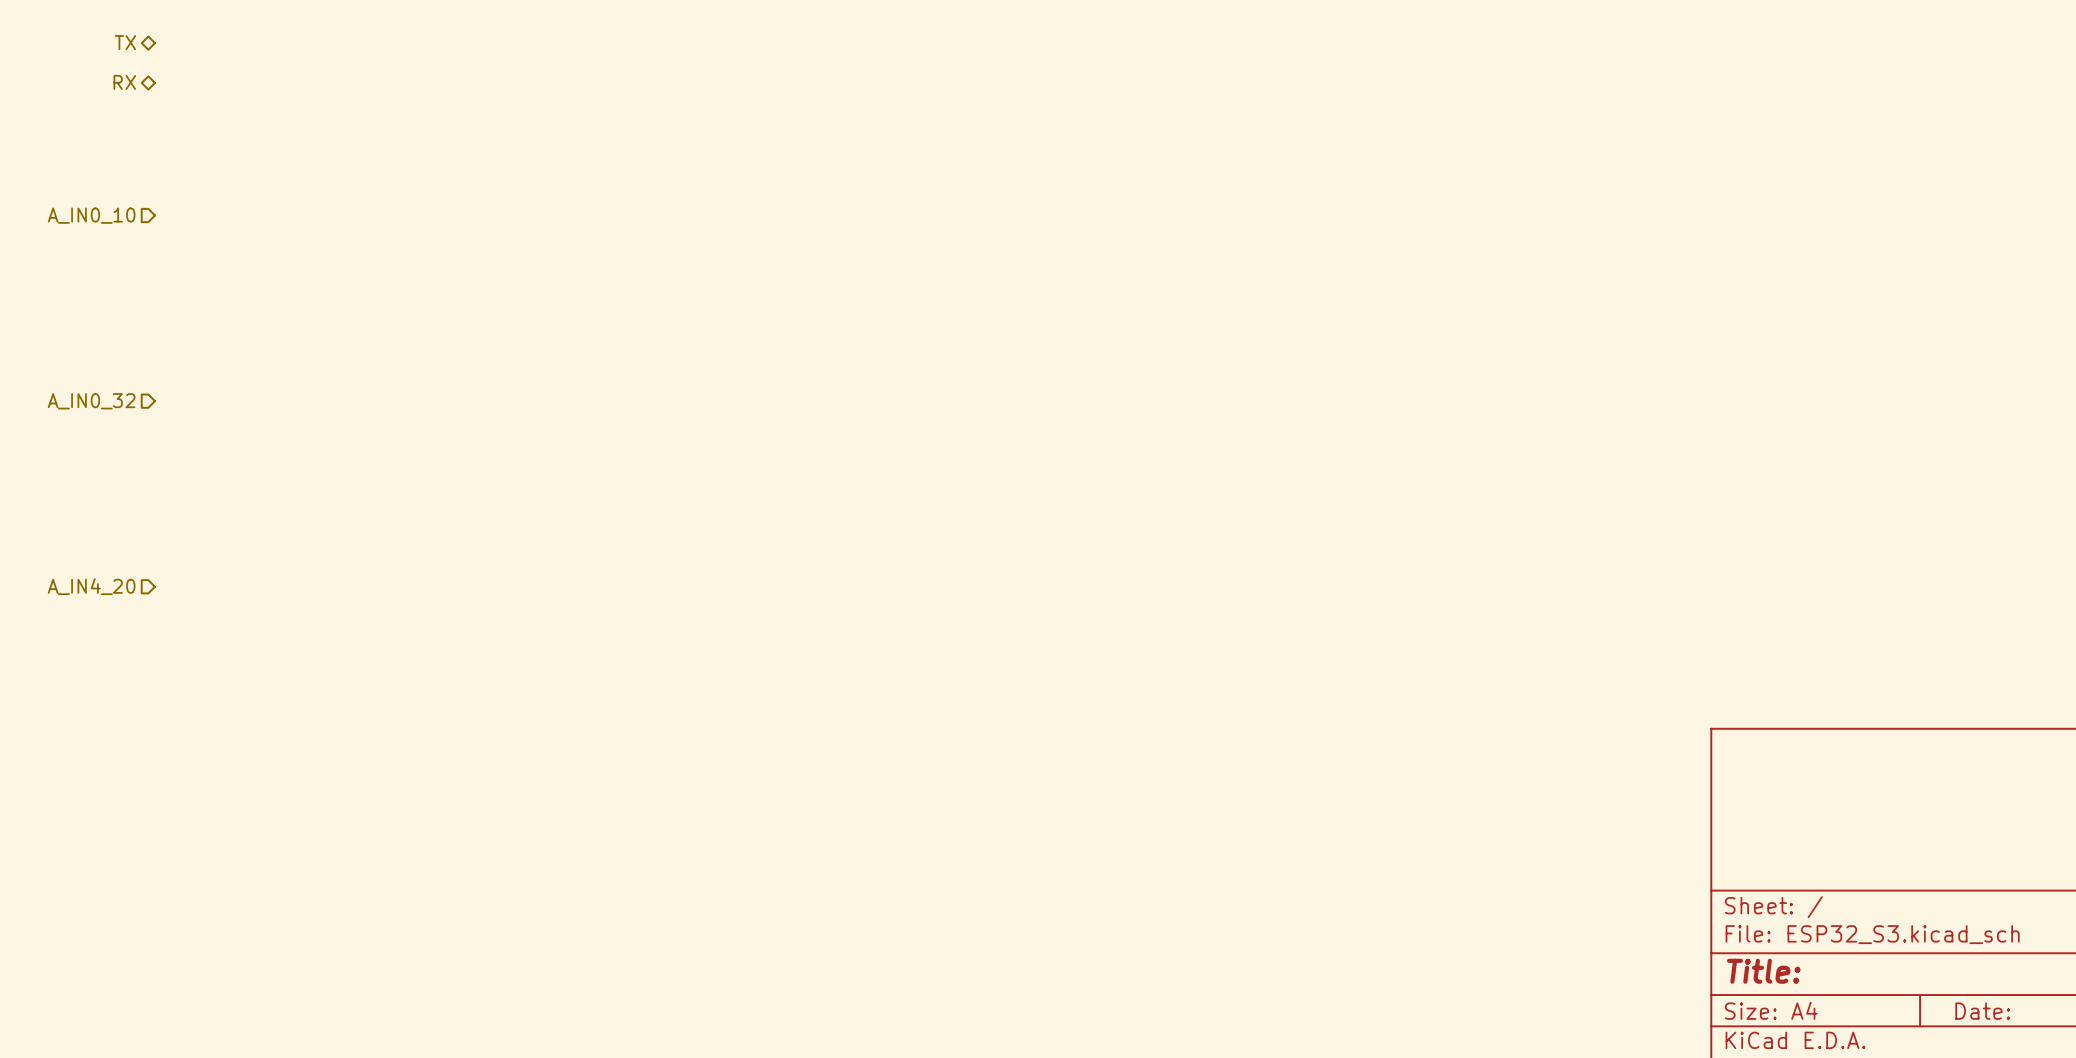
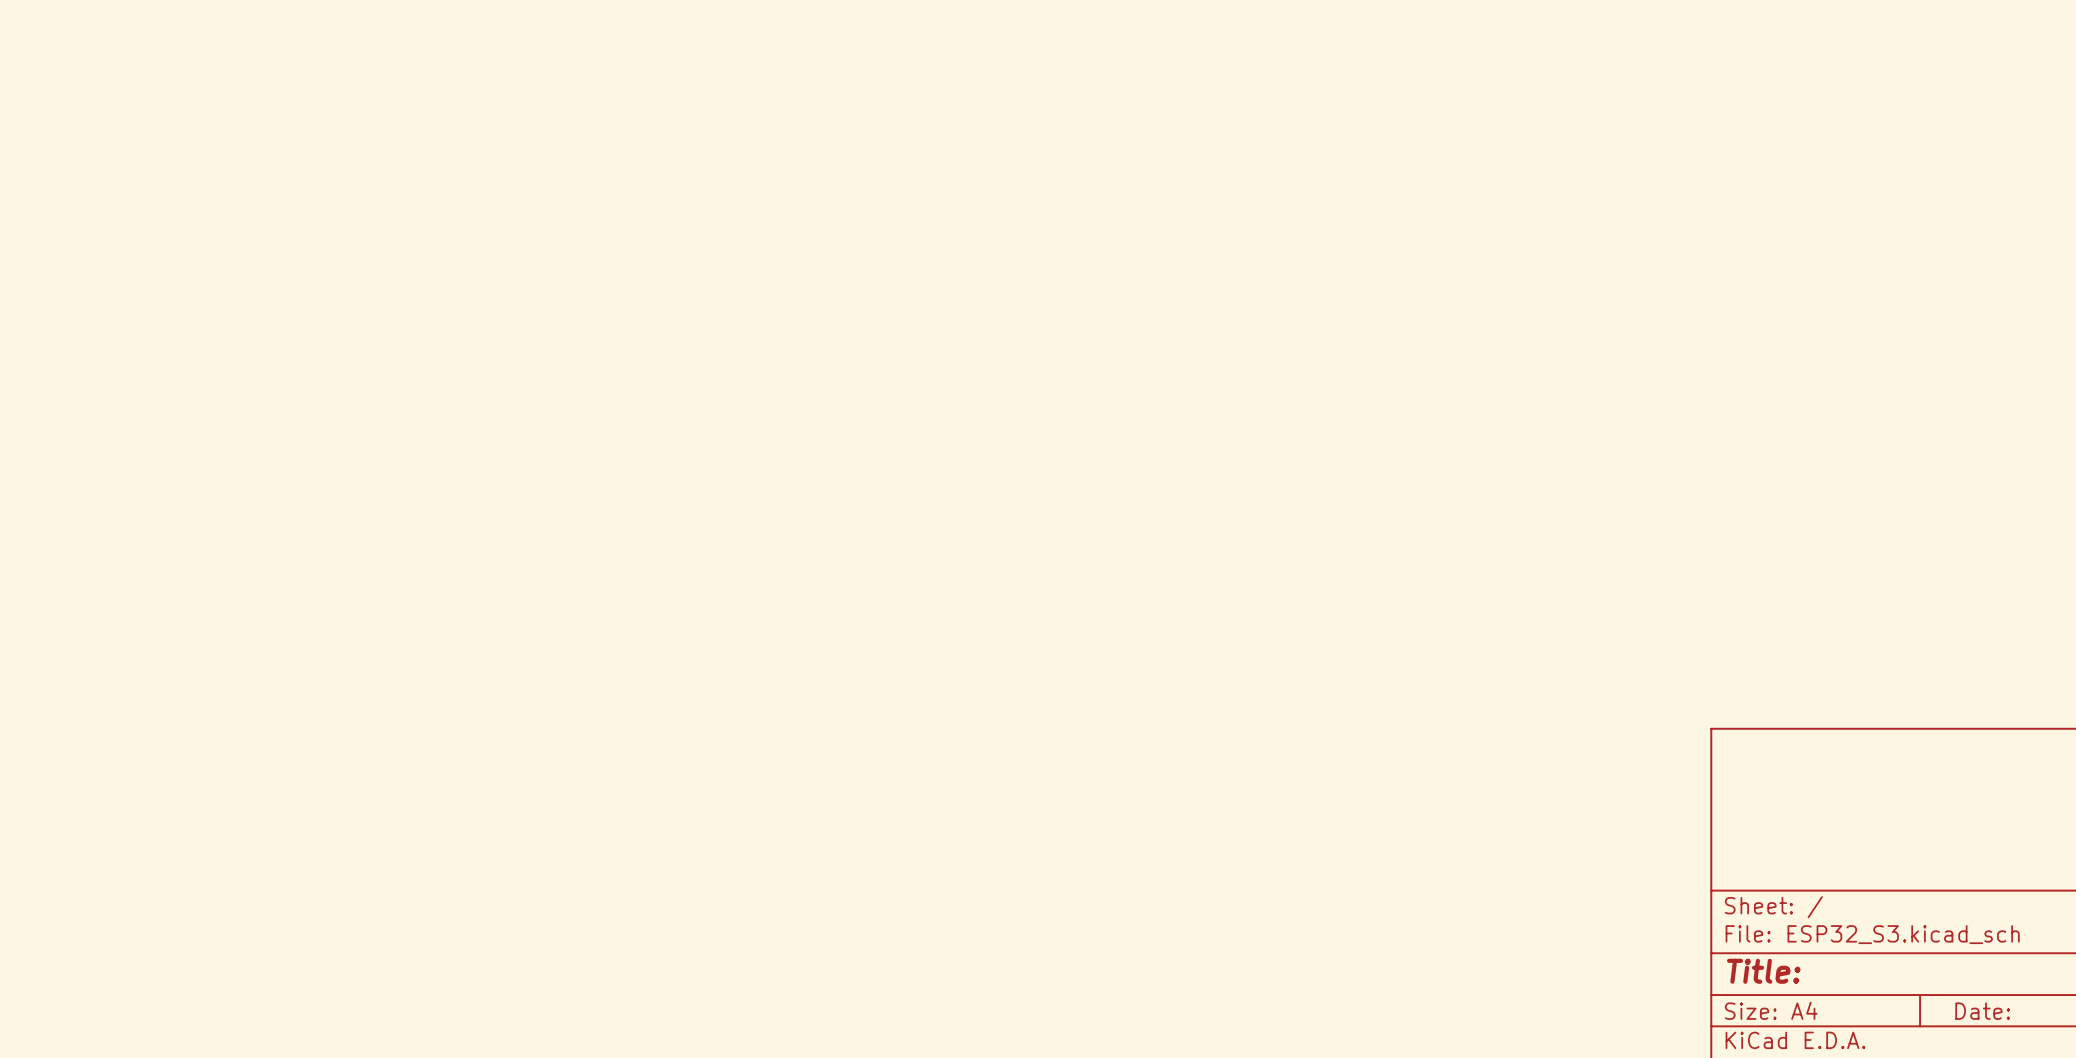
hierarchical label: TX (125, 42) -> none
hierarchical label: RX (124, 82) -> none
hierarchical label: A_IN0_10 (91, 215) -> none
hierarchical label: A_IN0_32 (91, 401) -> none
hierarchical label: A_IN4_20 (91, 586) -> none

